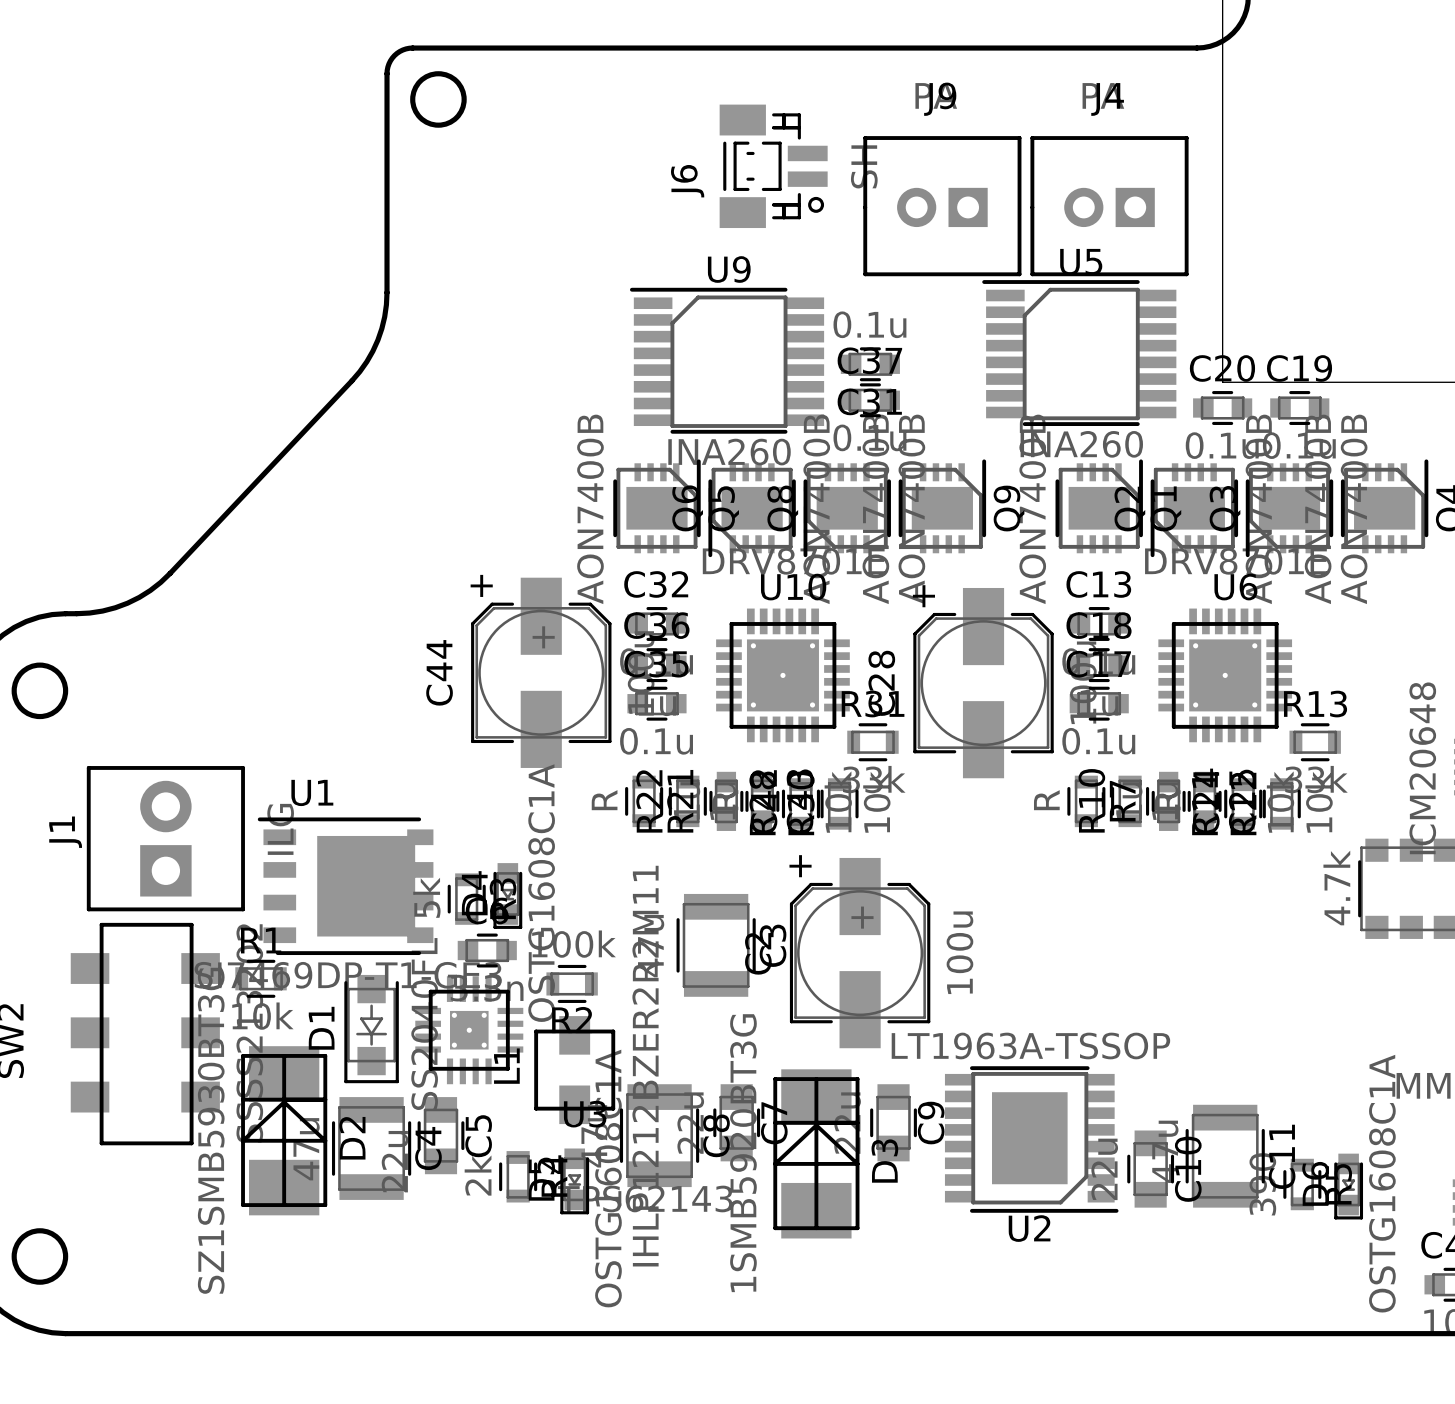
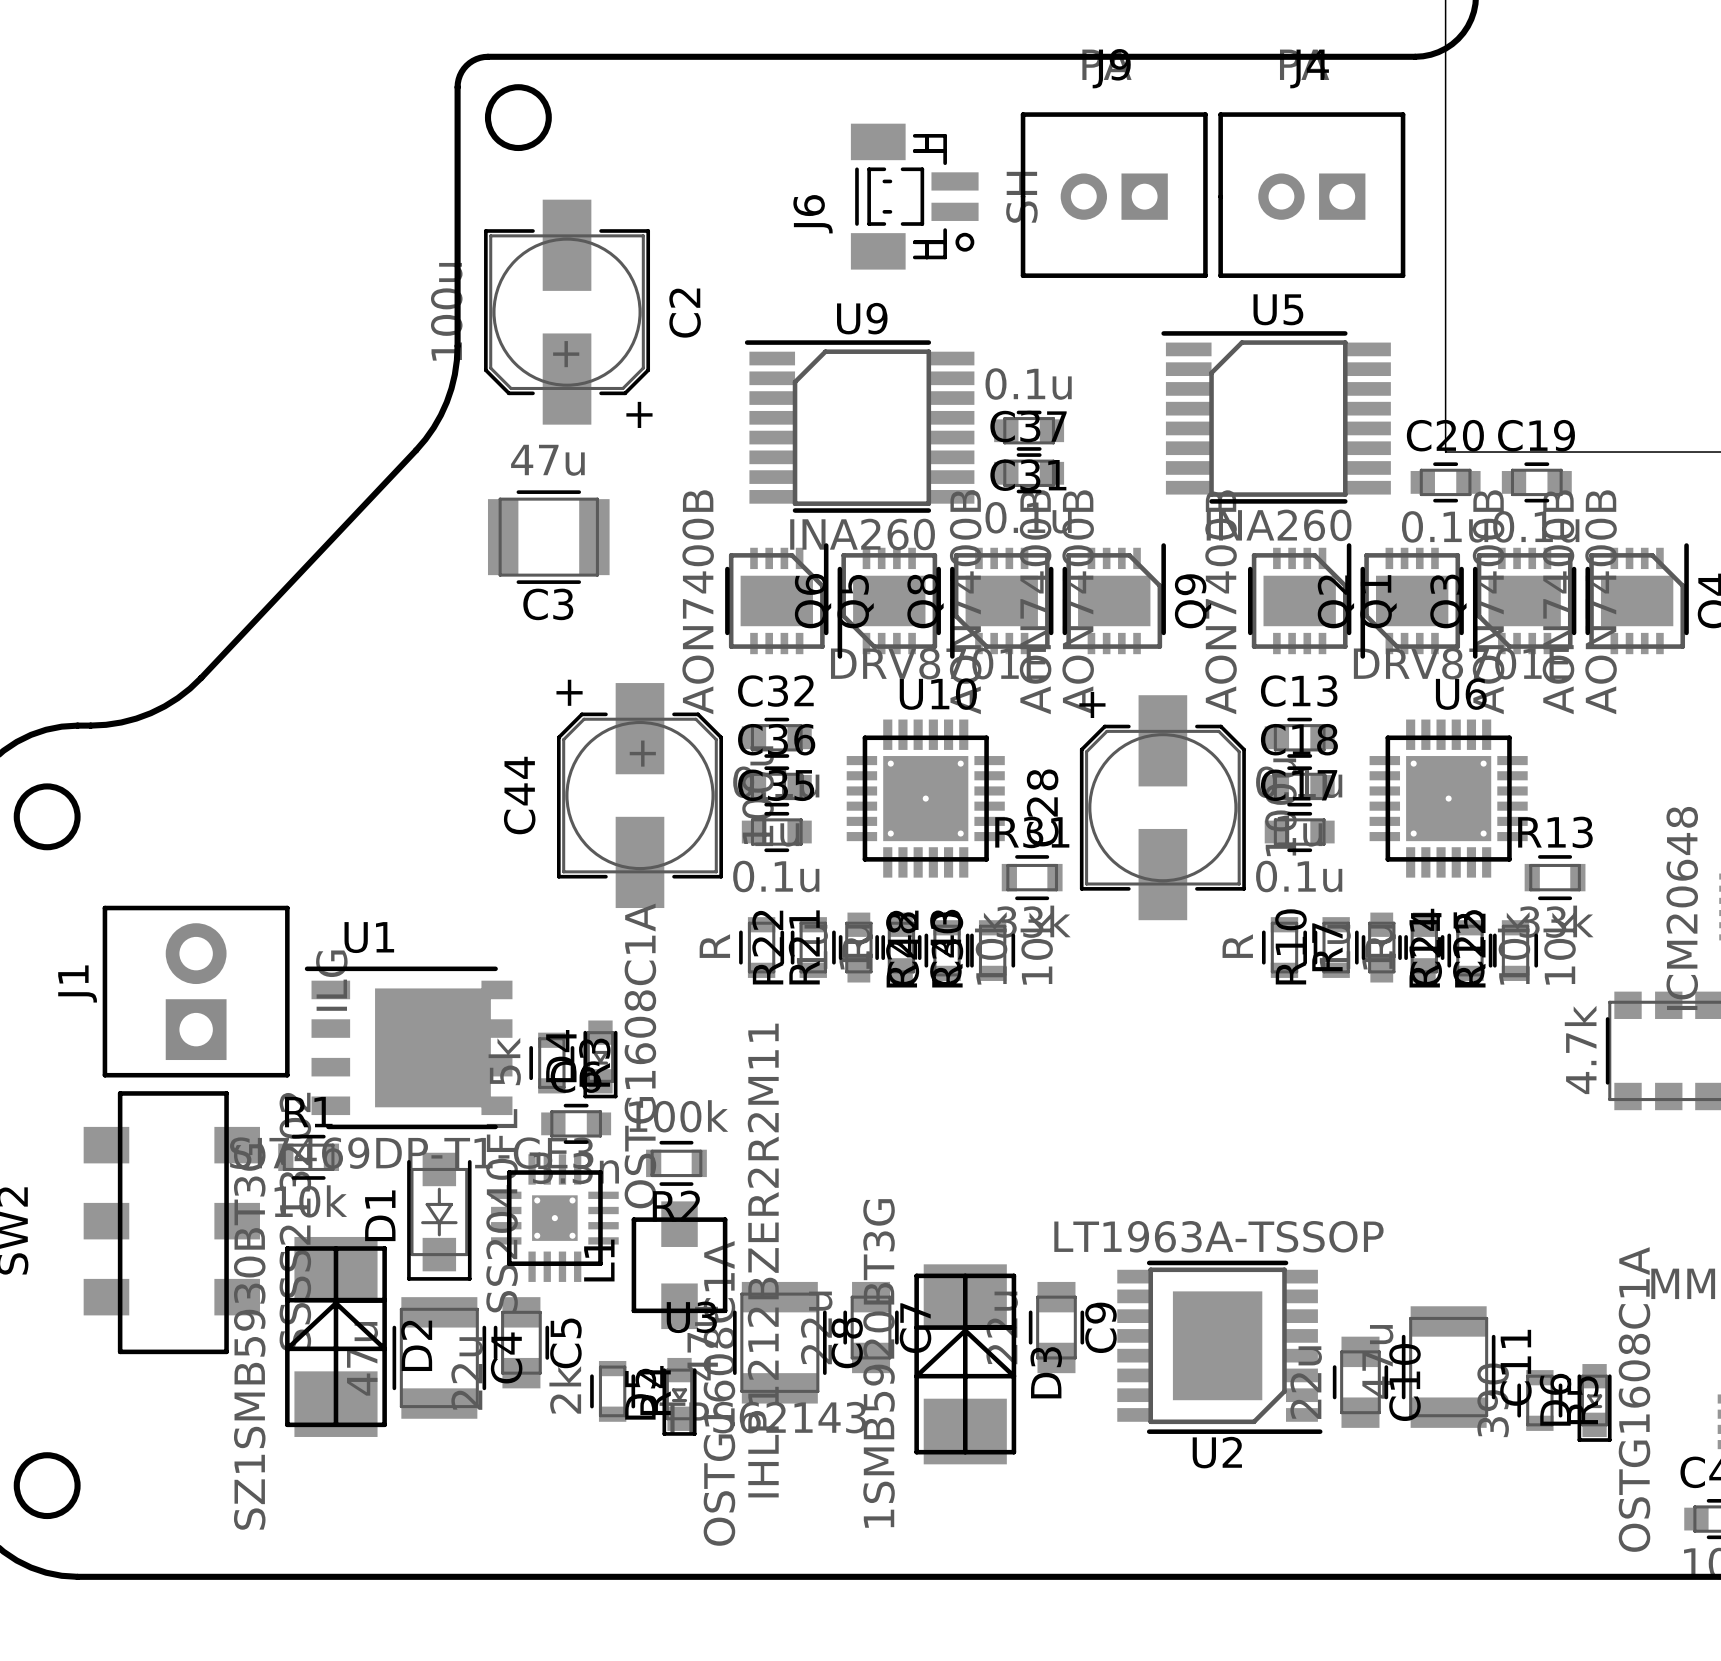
J9 position: (942, 206) -> (1114, 195)
J4 position: (1109, 206) -> (1311, 195)
C3 rotation: 0° (716, 945) -> 90° clockwise (548, 537)
C3 position: (716, 945) -> (548, 537)
C2 rotation: 0° (860, 953) -> 180° (567, 312)
C2 position: (860, 953) -> (567, 312)

